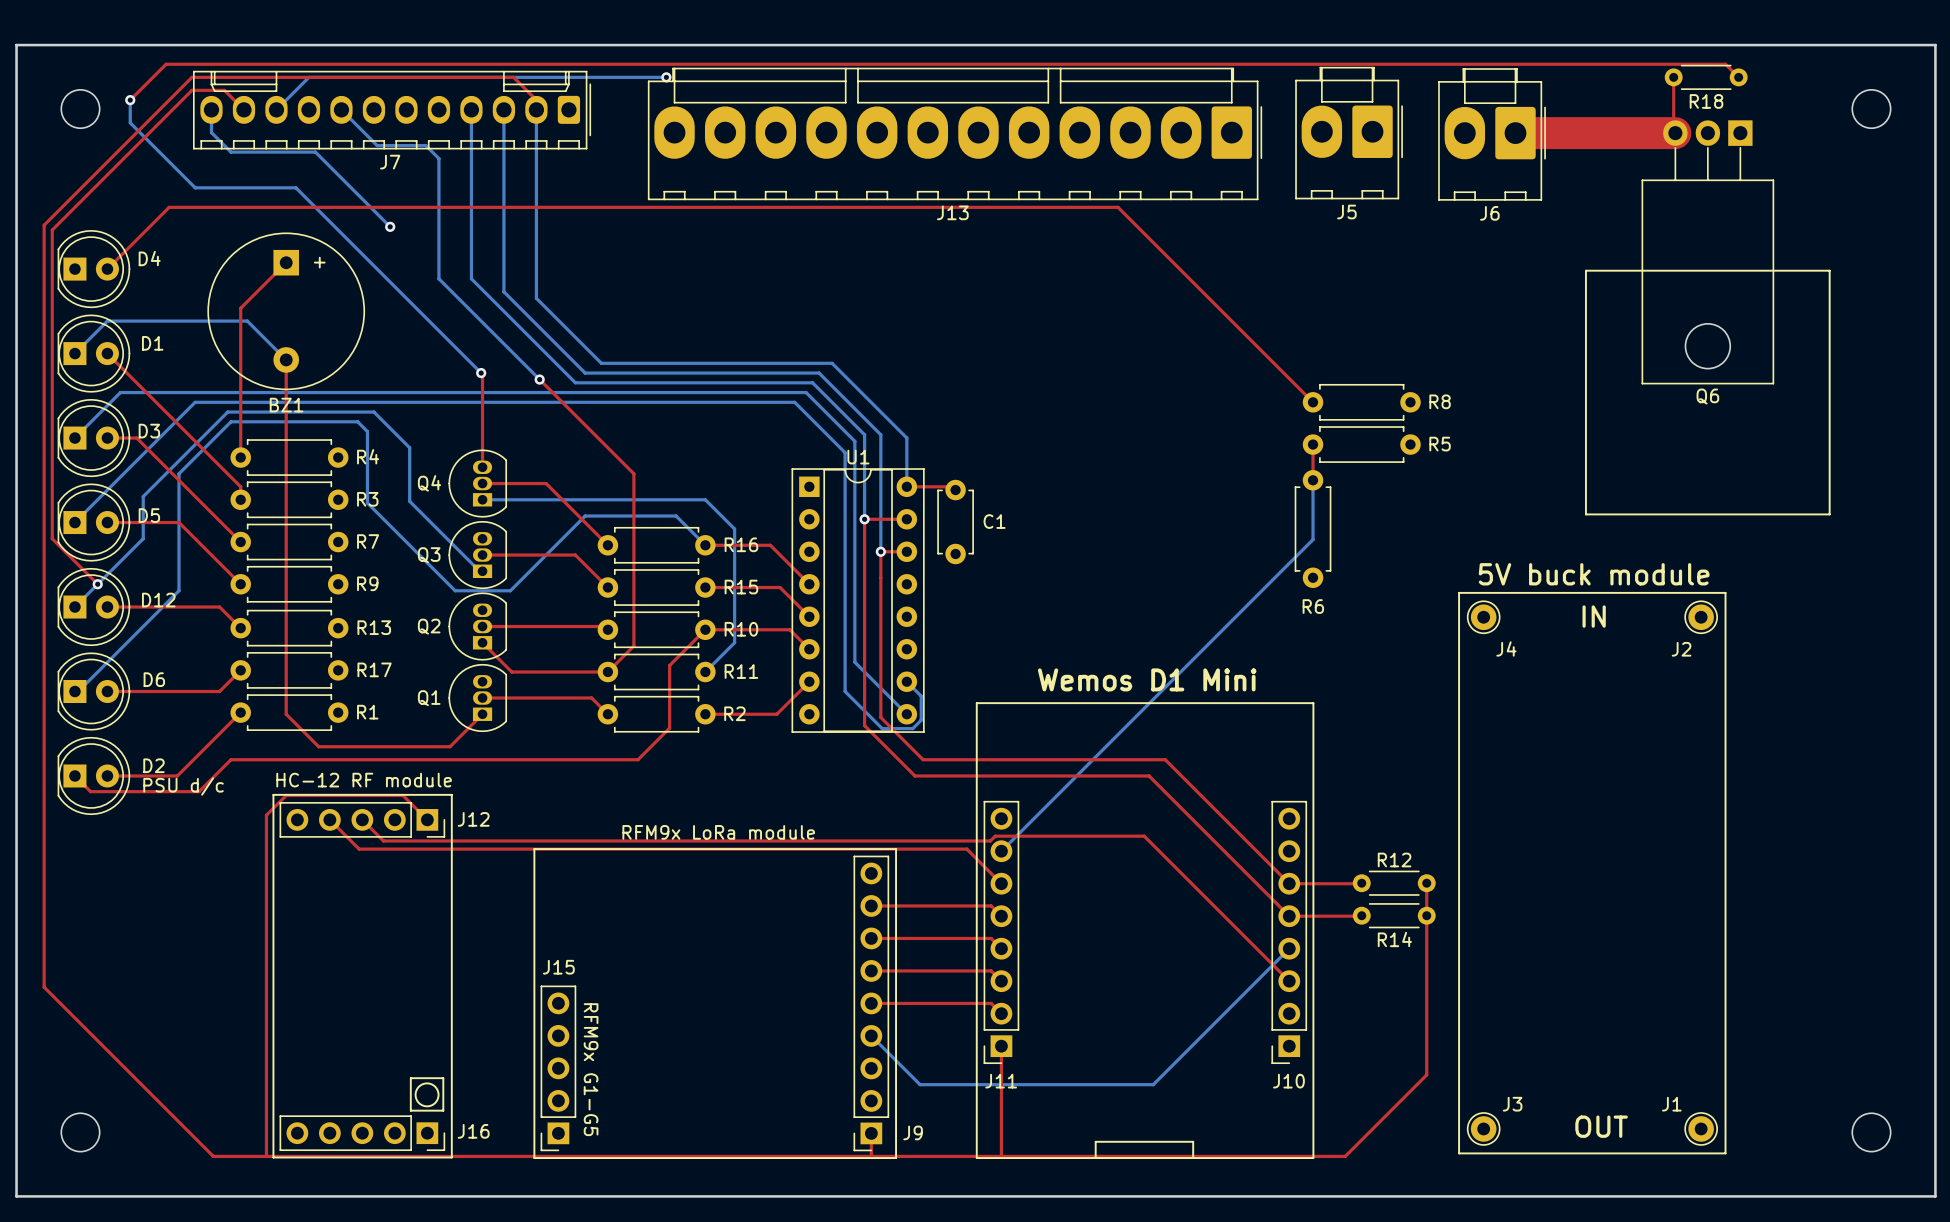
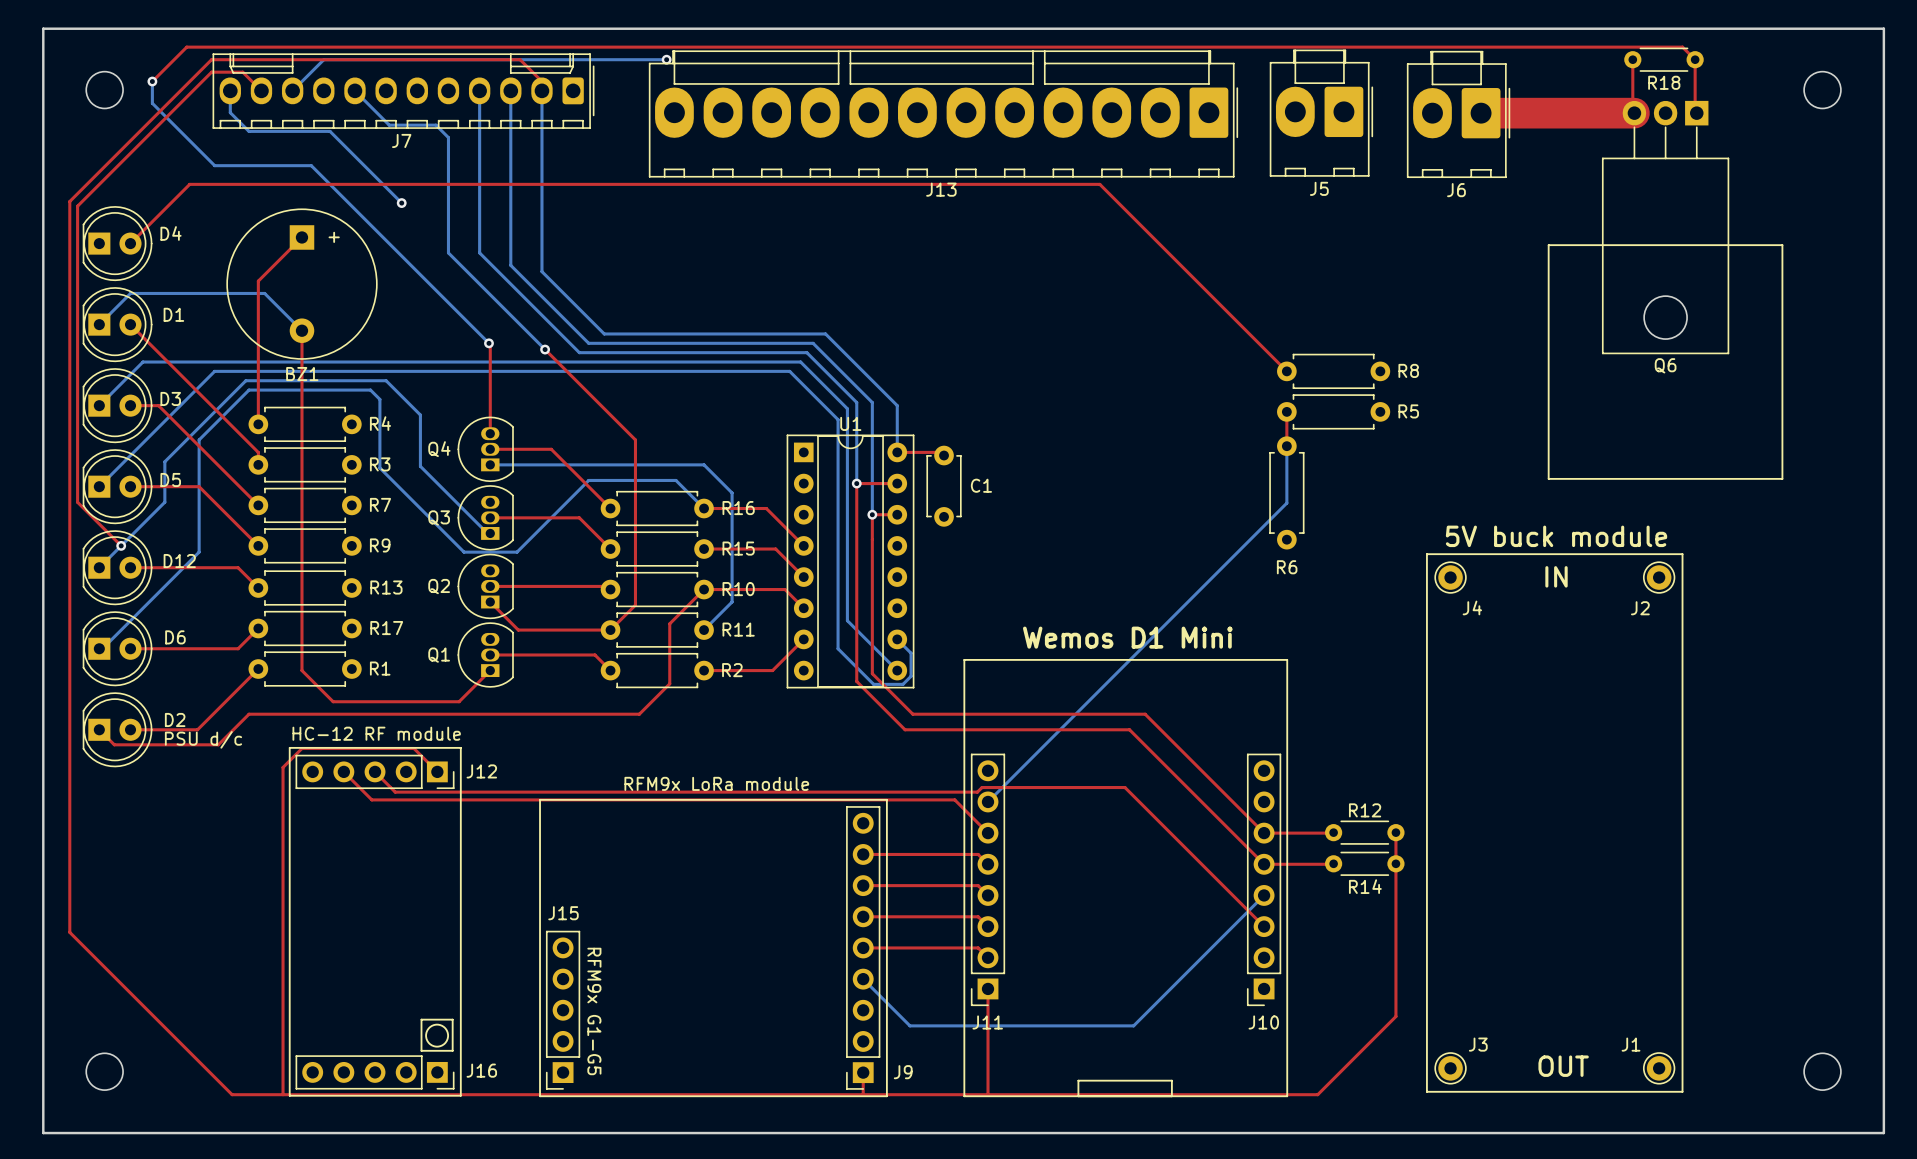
top track: none -> (1695, 59) (1695, 111) (1696, 113)

